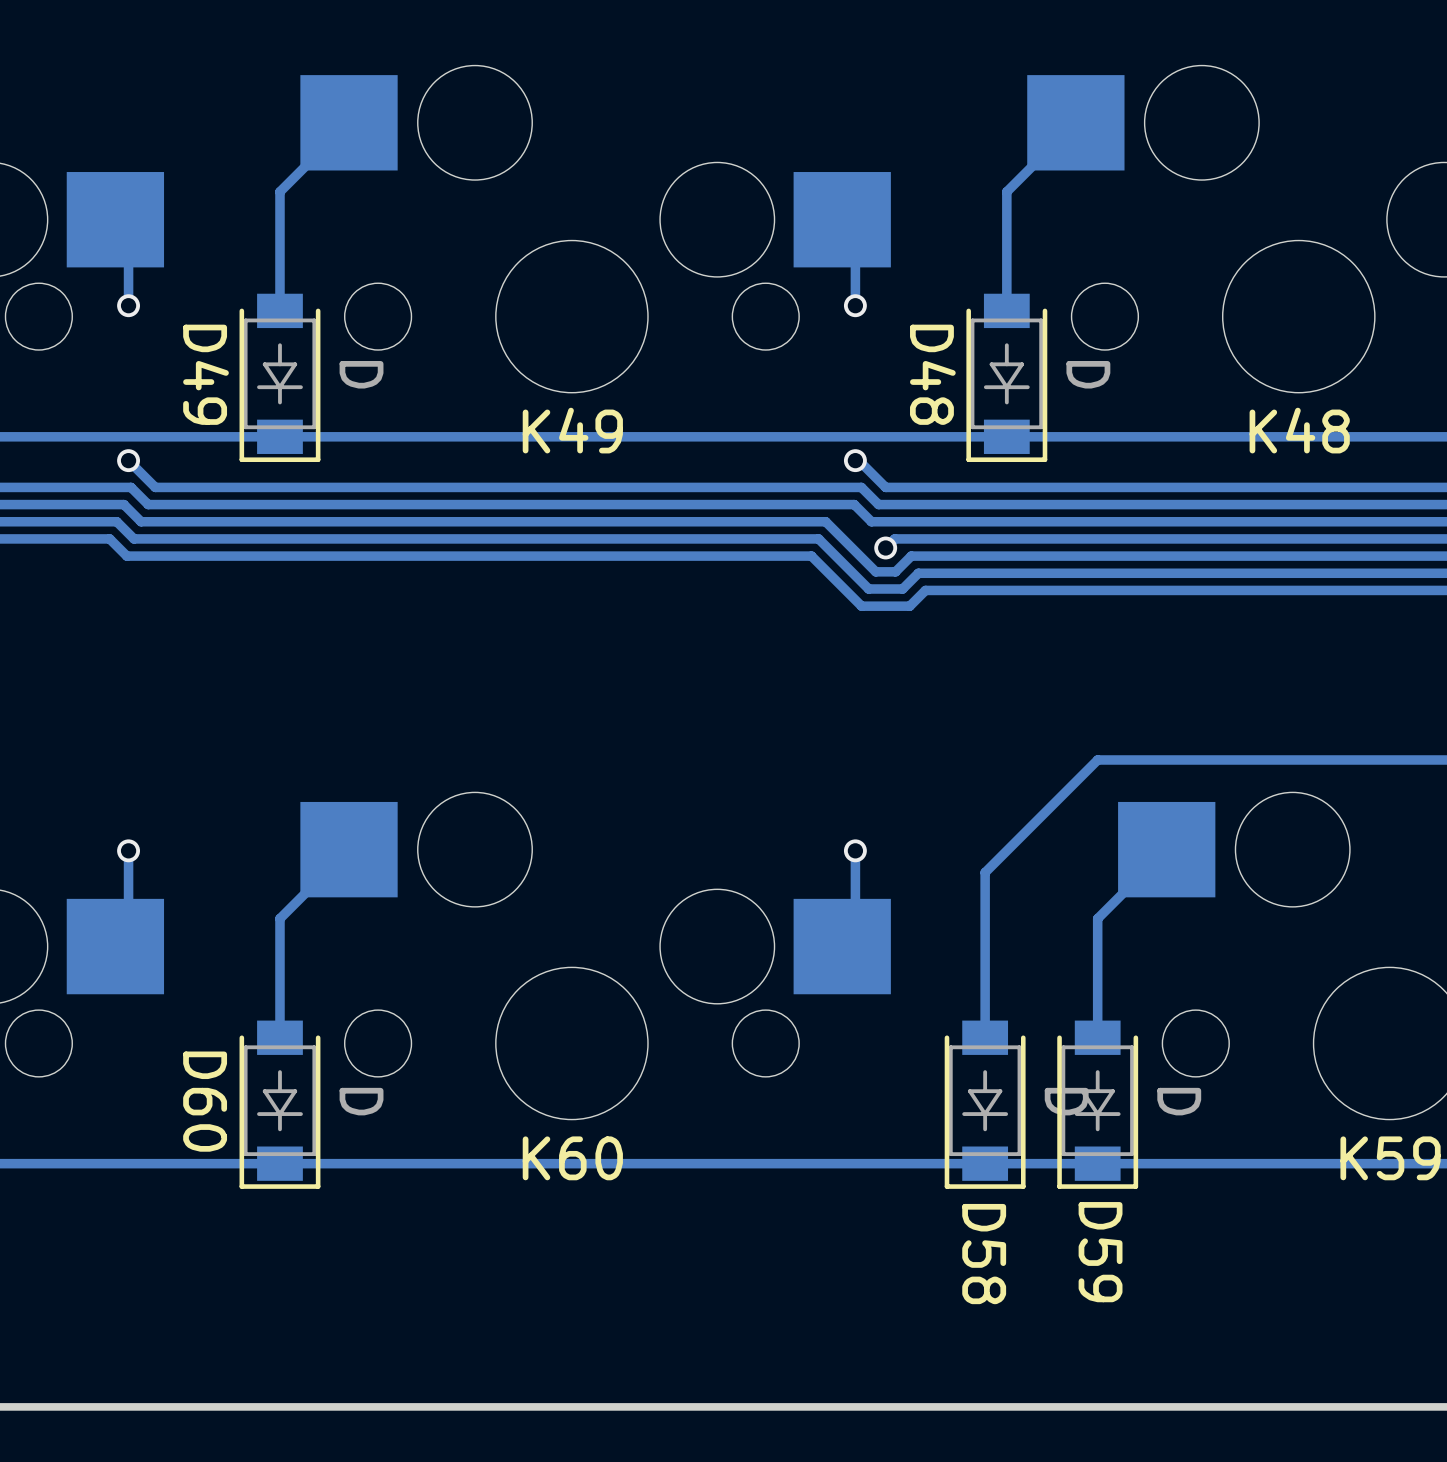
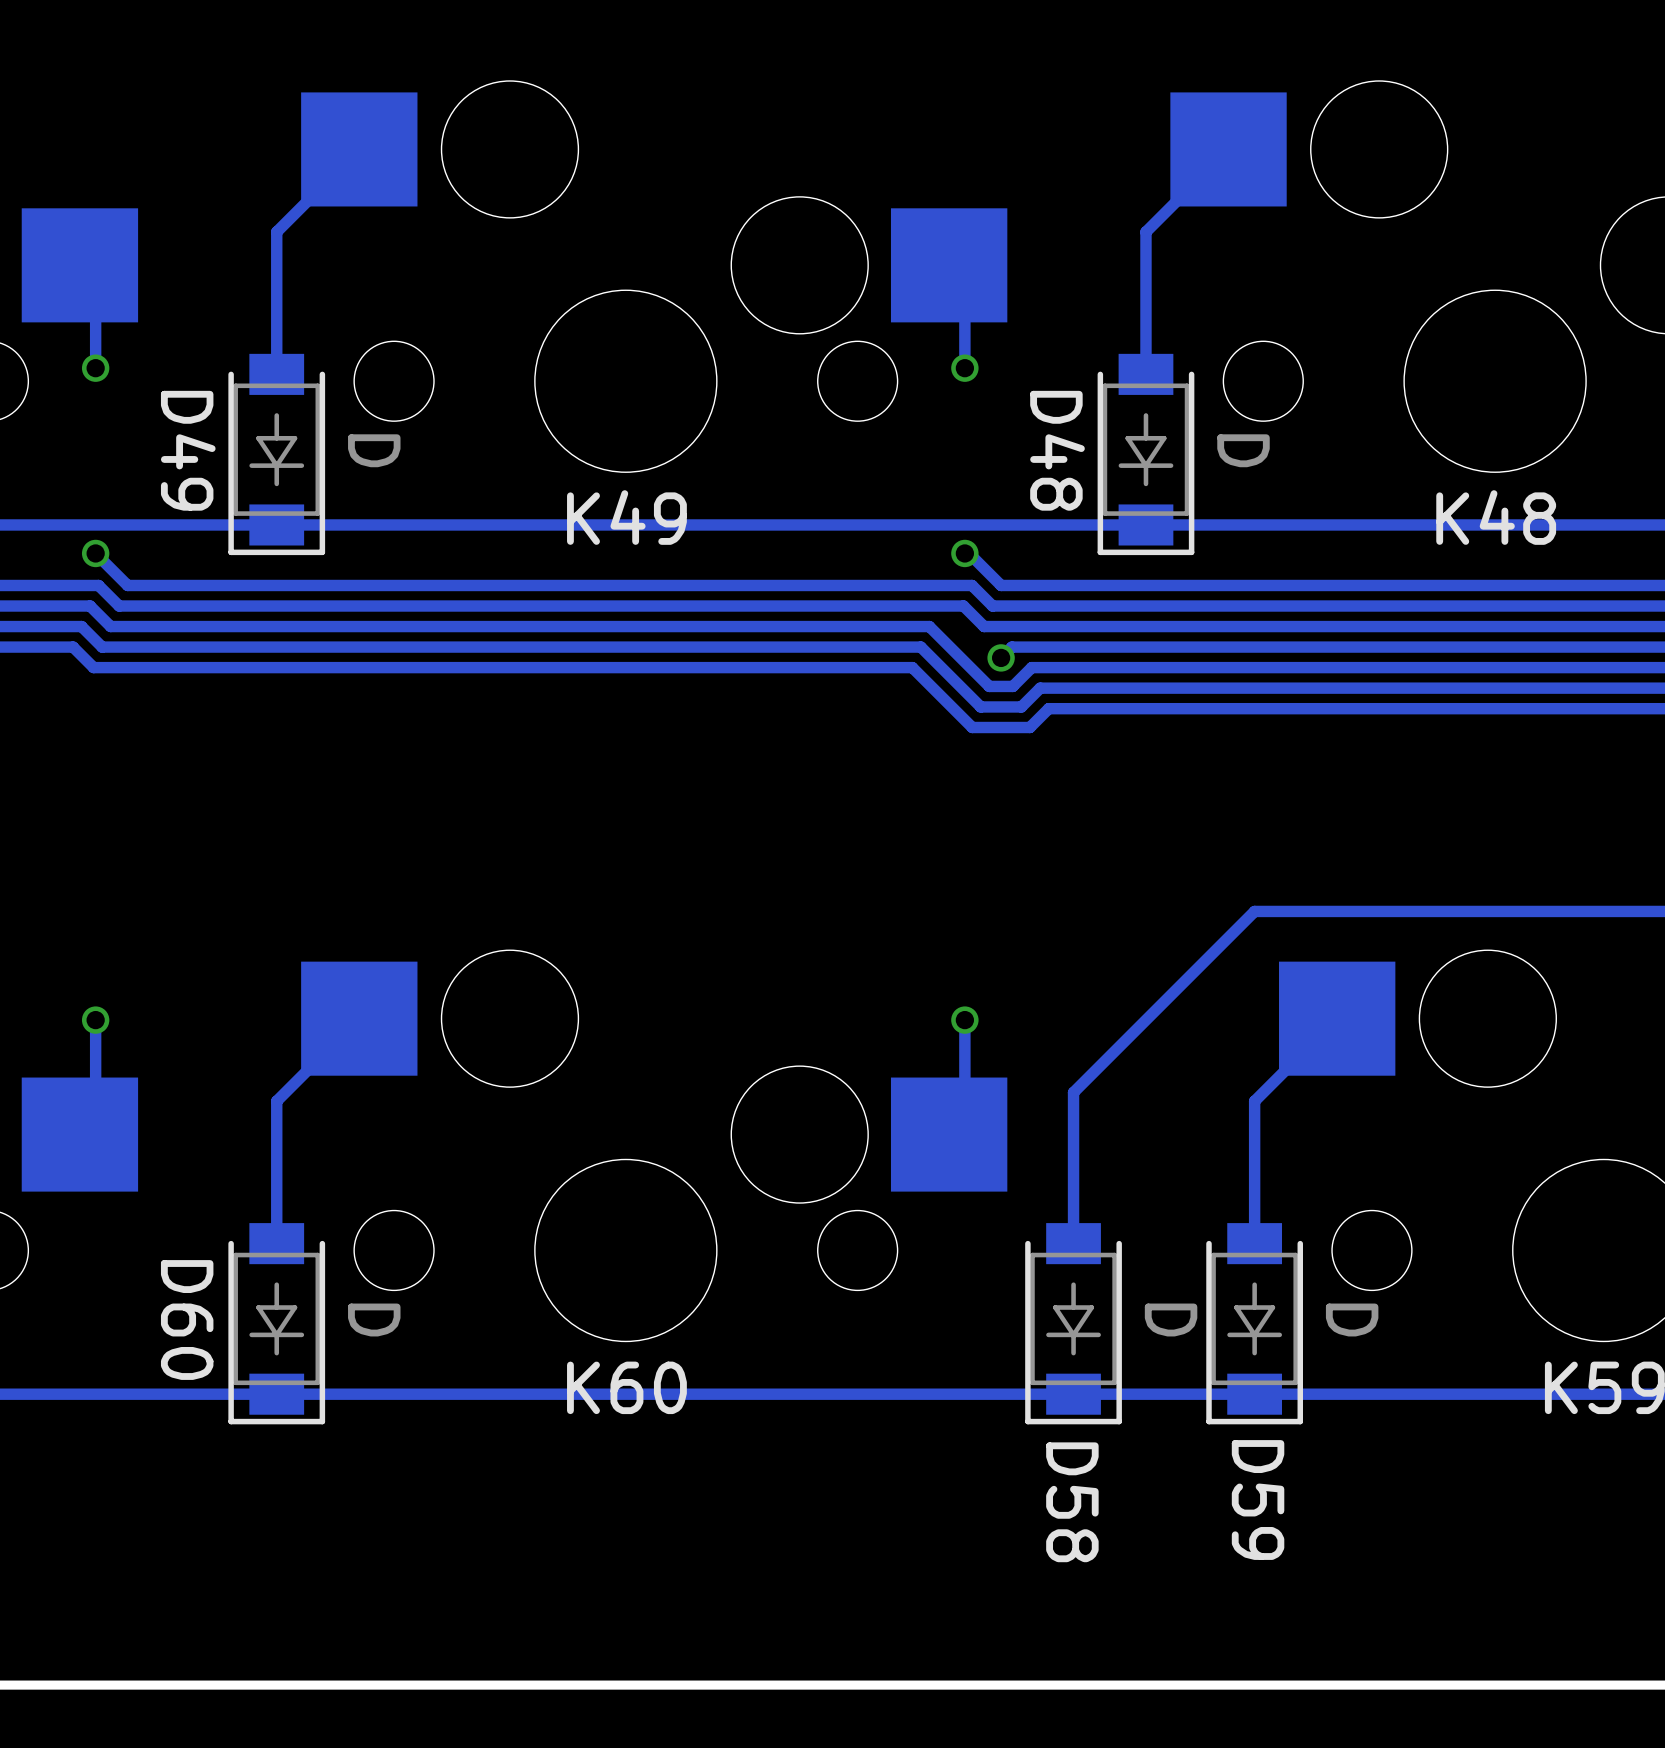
track: (985, 872) (985, 1037) -> (1120, 1046) (1073, 1092) (1073, 1243)
D58 position: (985, 1104) -> (1073, 1323)

